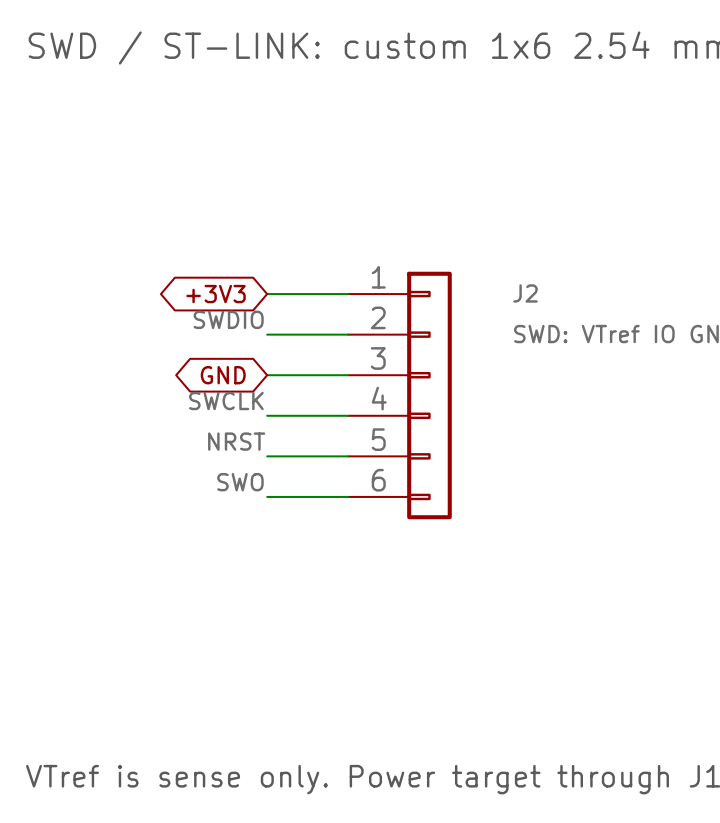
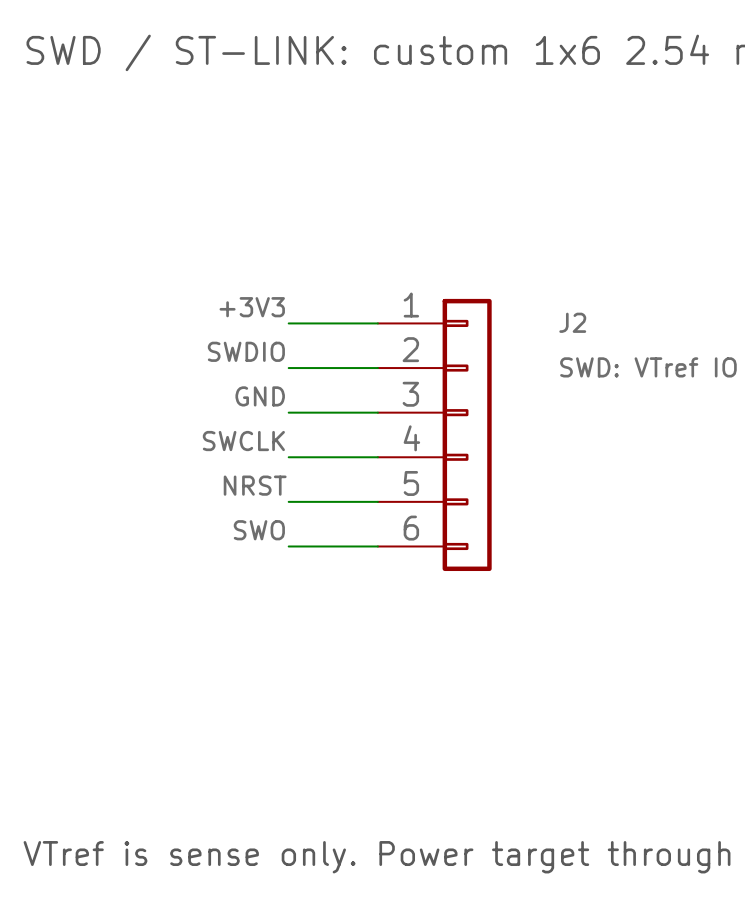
label: none -> +3V3 (252, 307)
global label: +3V3 (216, 294) -> none
label: none -> GND (260, 396)
global label: GND (223, 375) -> none

